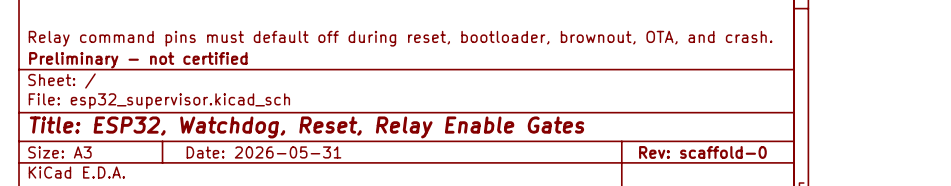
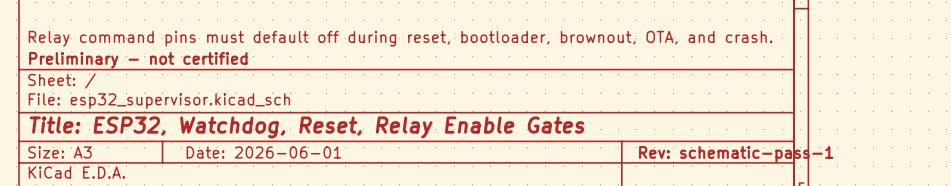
title block: Date: 2026-05-31 (263, 152) -> Date: 2026-06-01 (263, 152)
title block: Rev: scaffold-0 (702, 152) -> Rev: schematic-pass-1 (736, 154)

